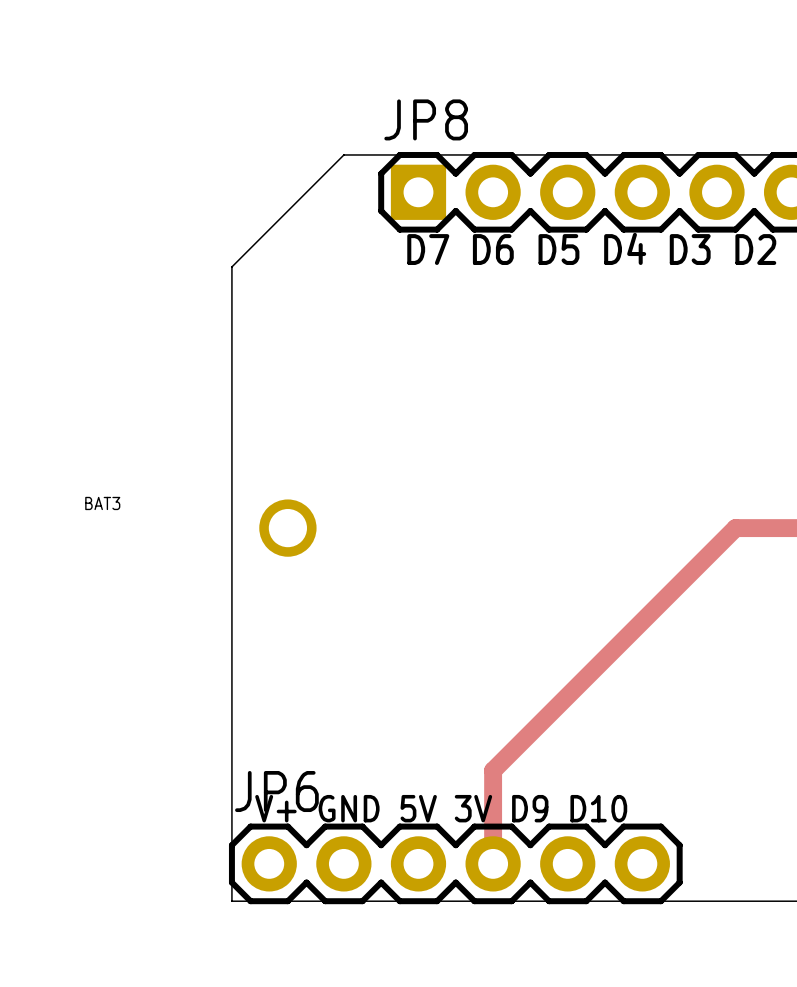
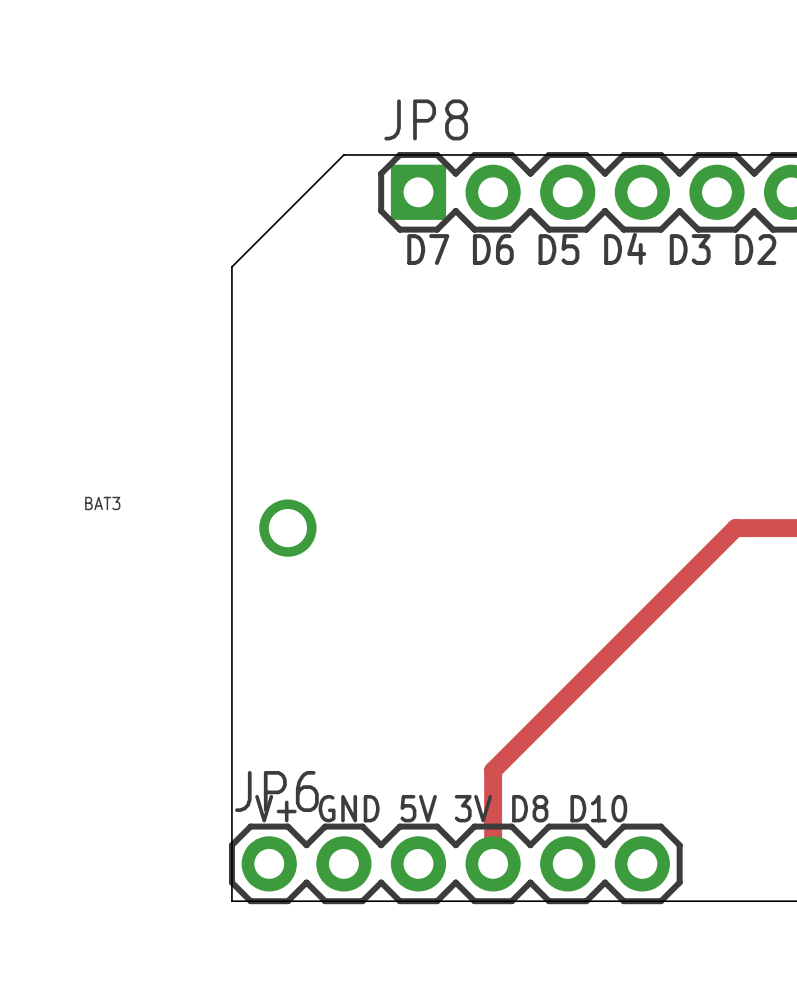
text: V+ GND 5V 3V D9 D10 (441, 808) -> V+ GND 5V 3V D8 D10 (441, 808)

